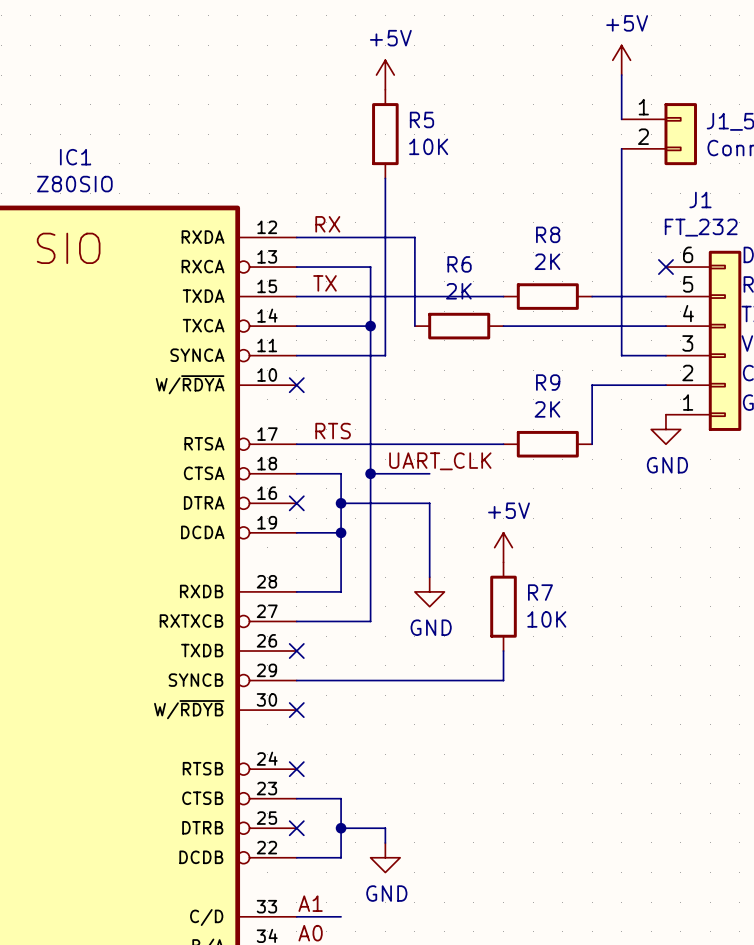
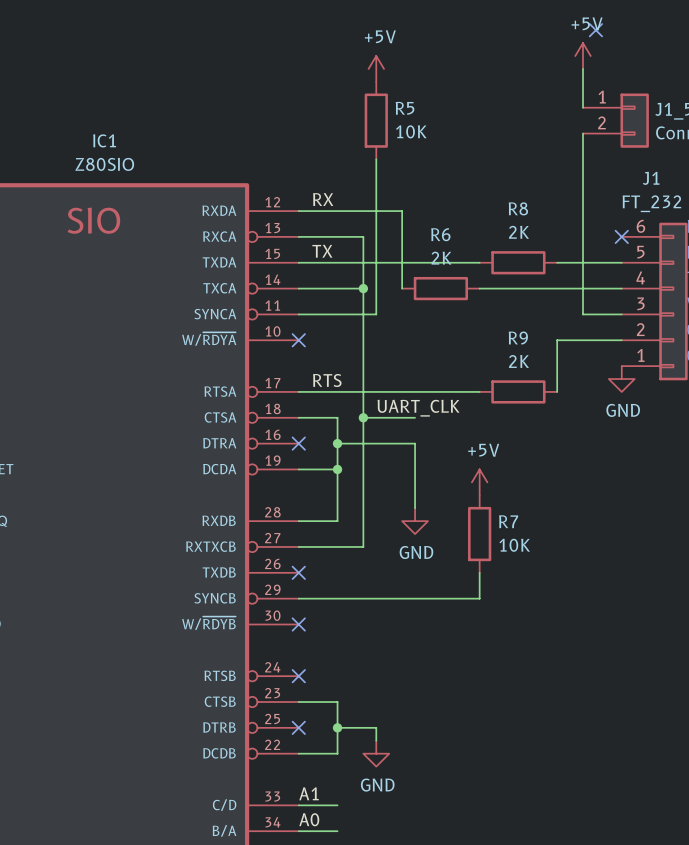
no-connect mark: none -> (595, 30)

